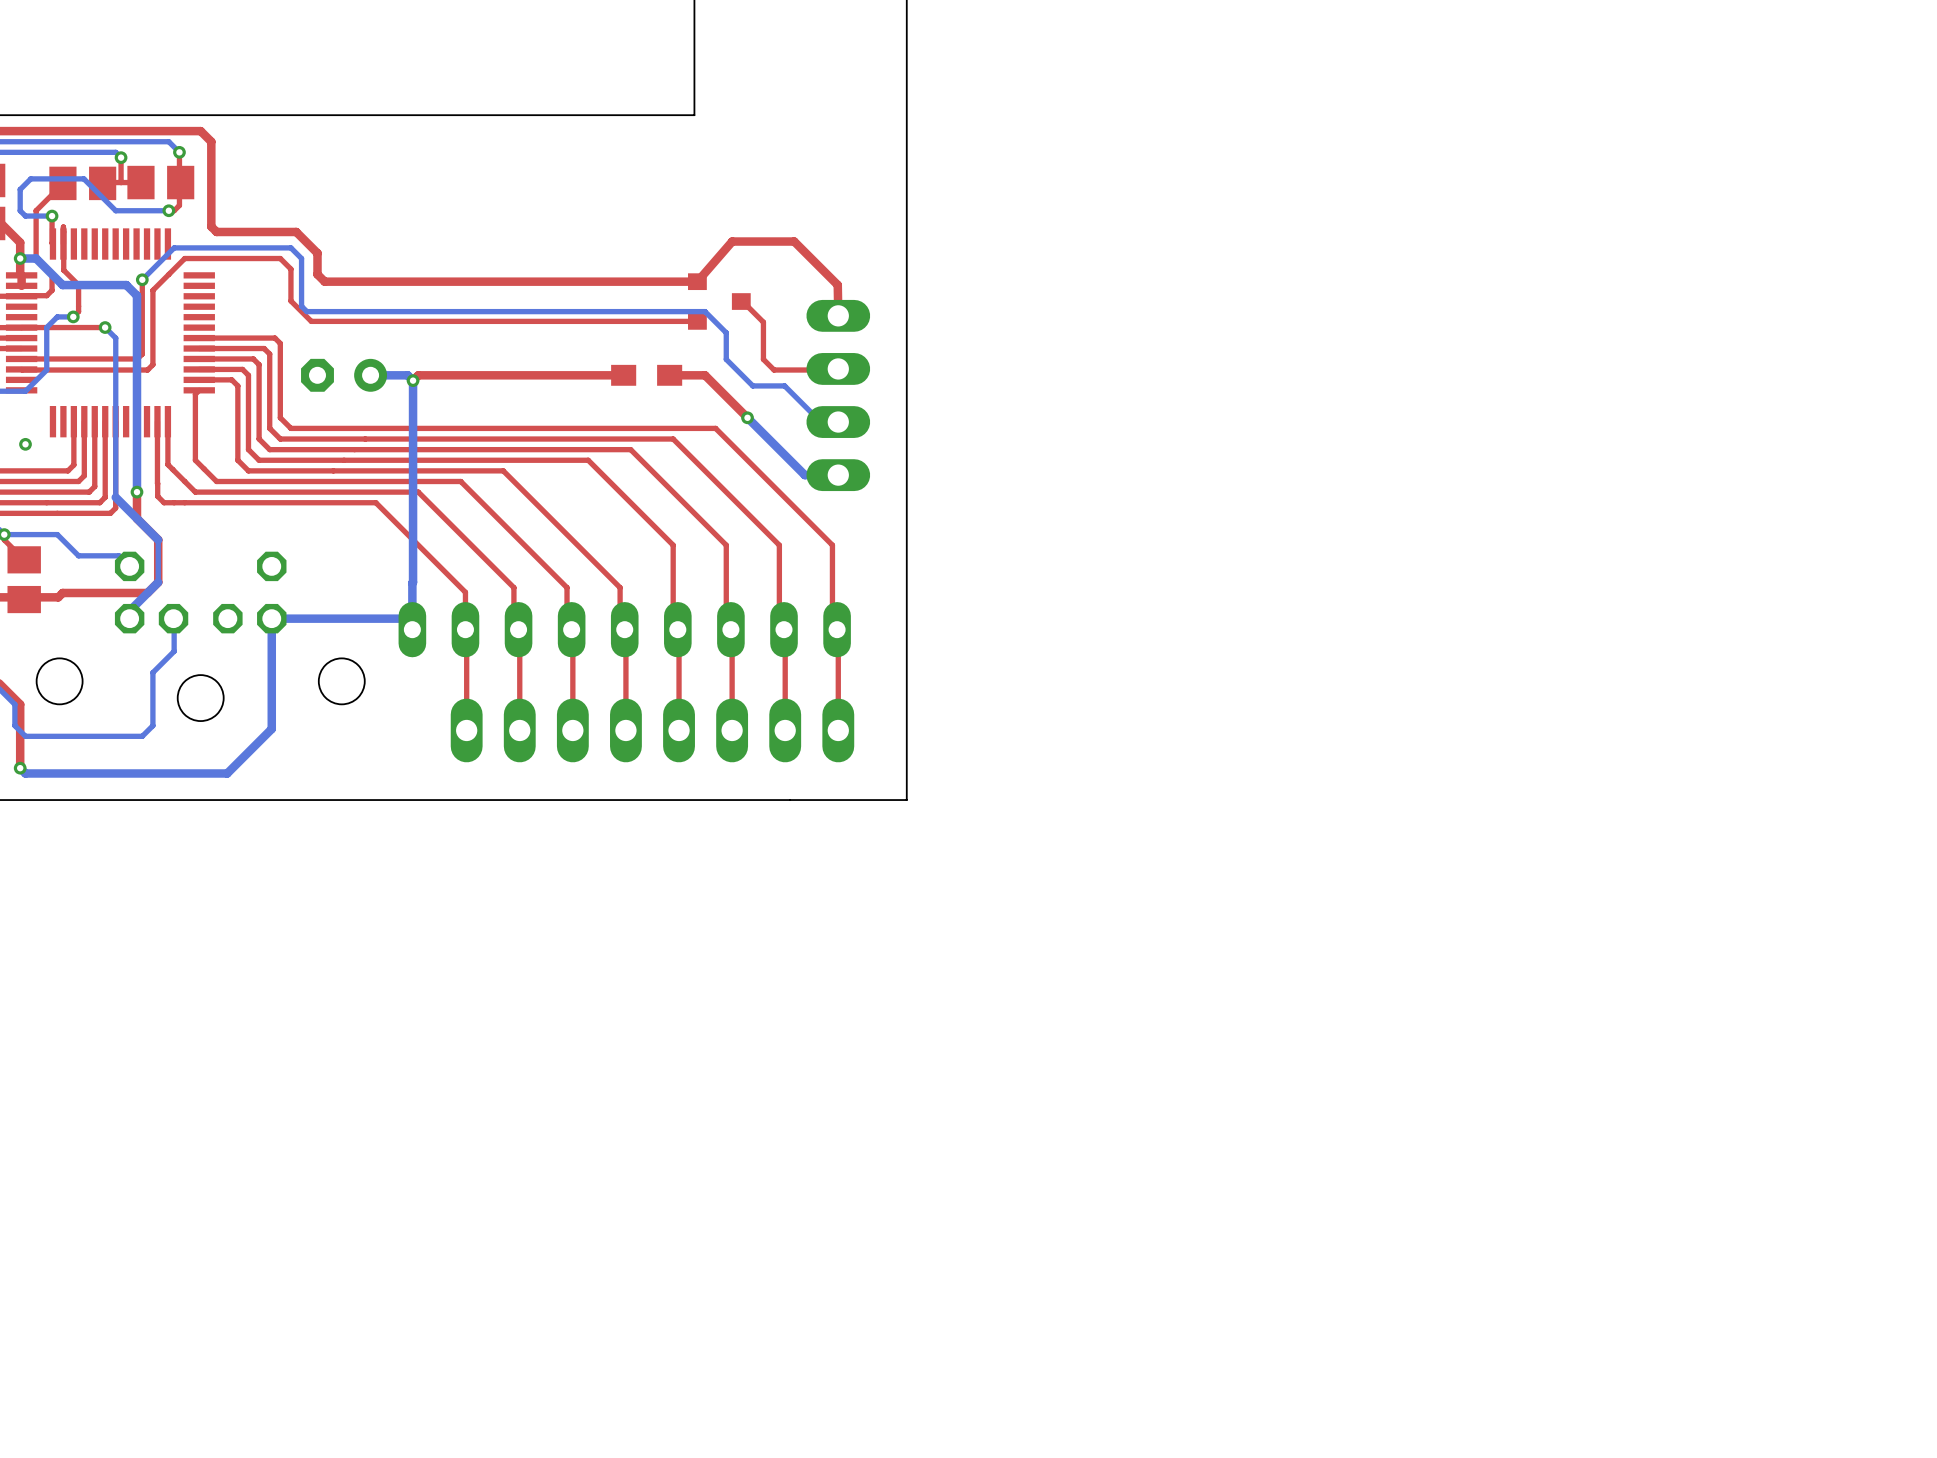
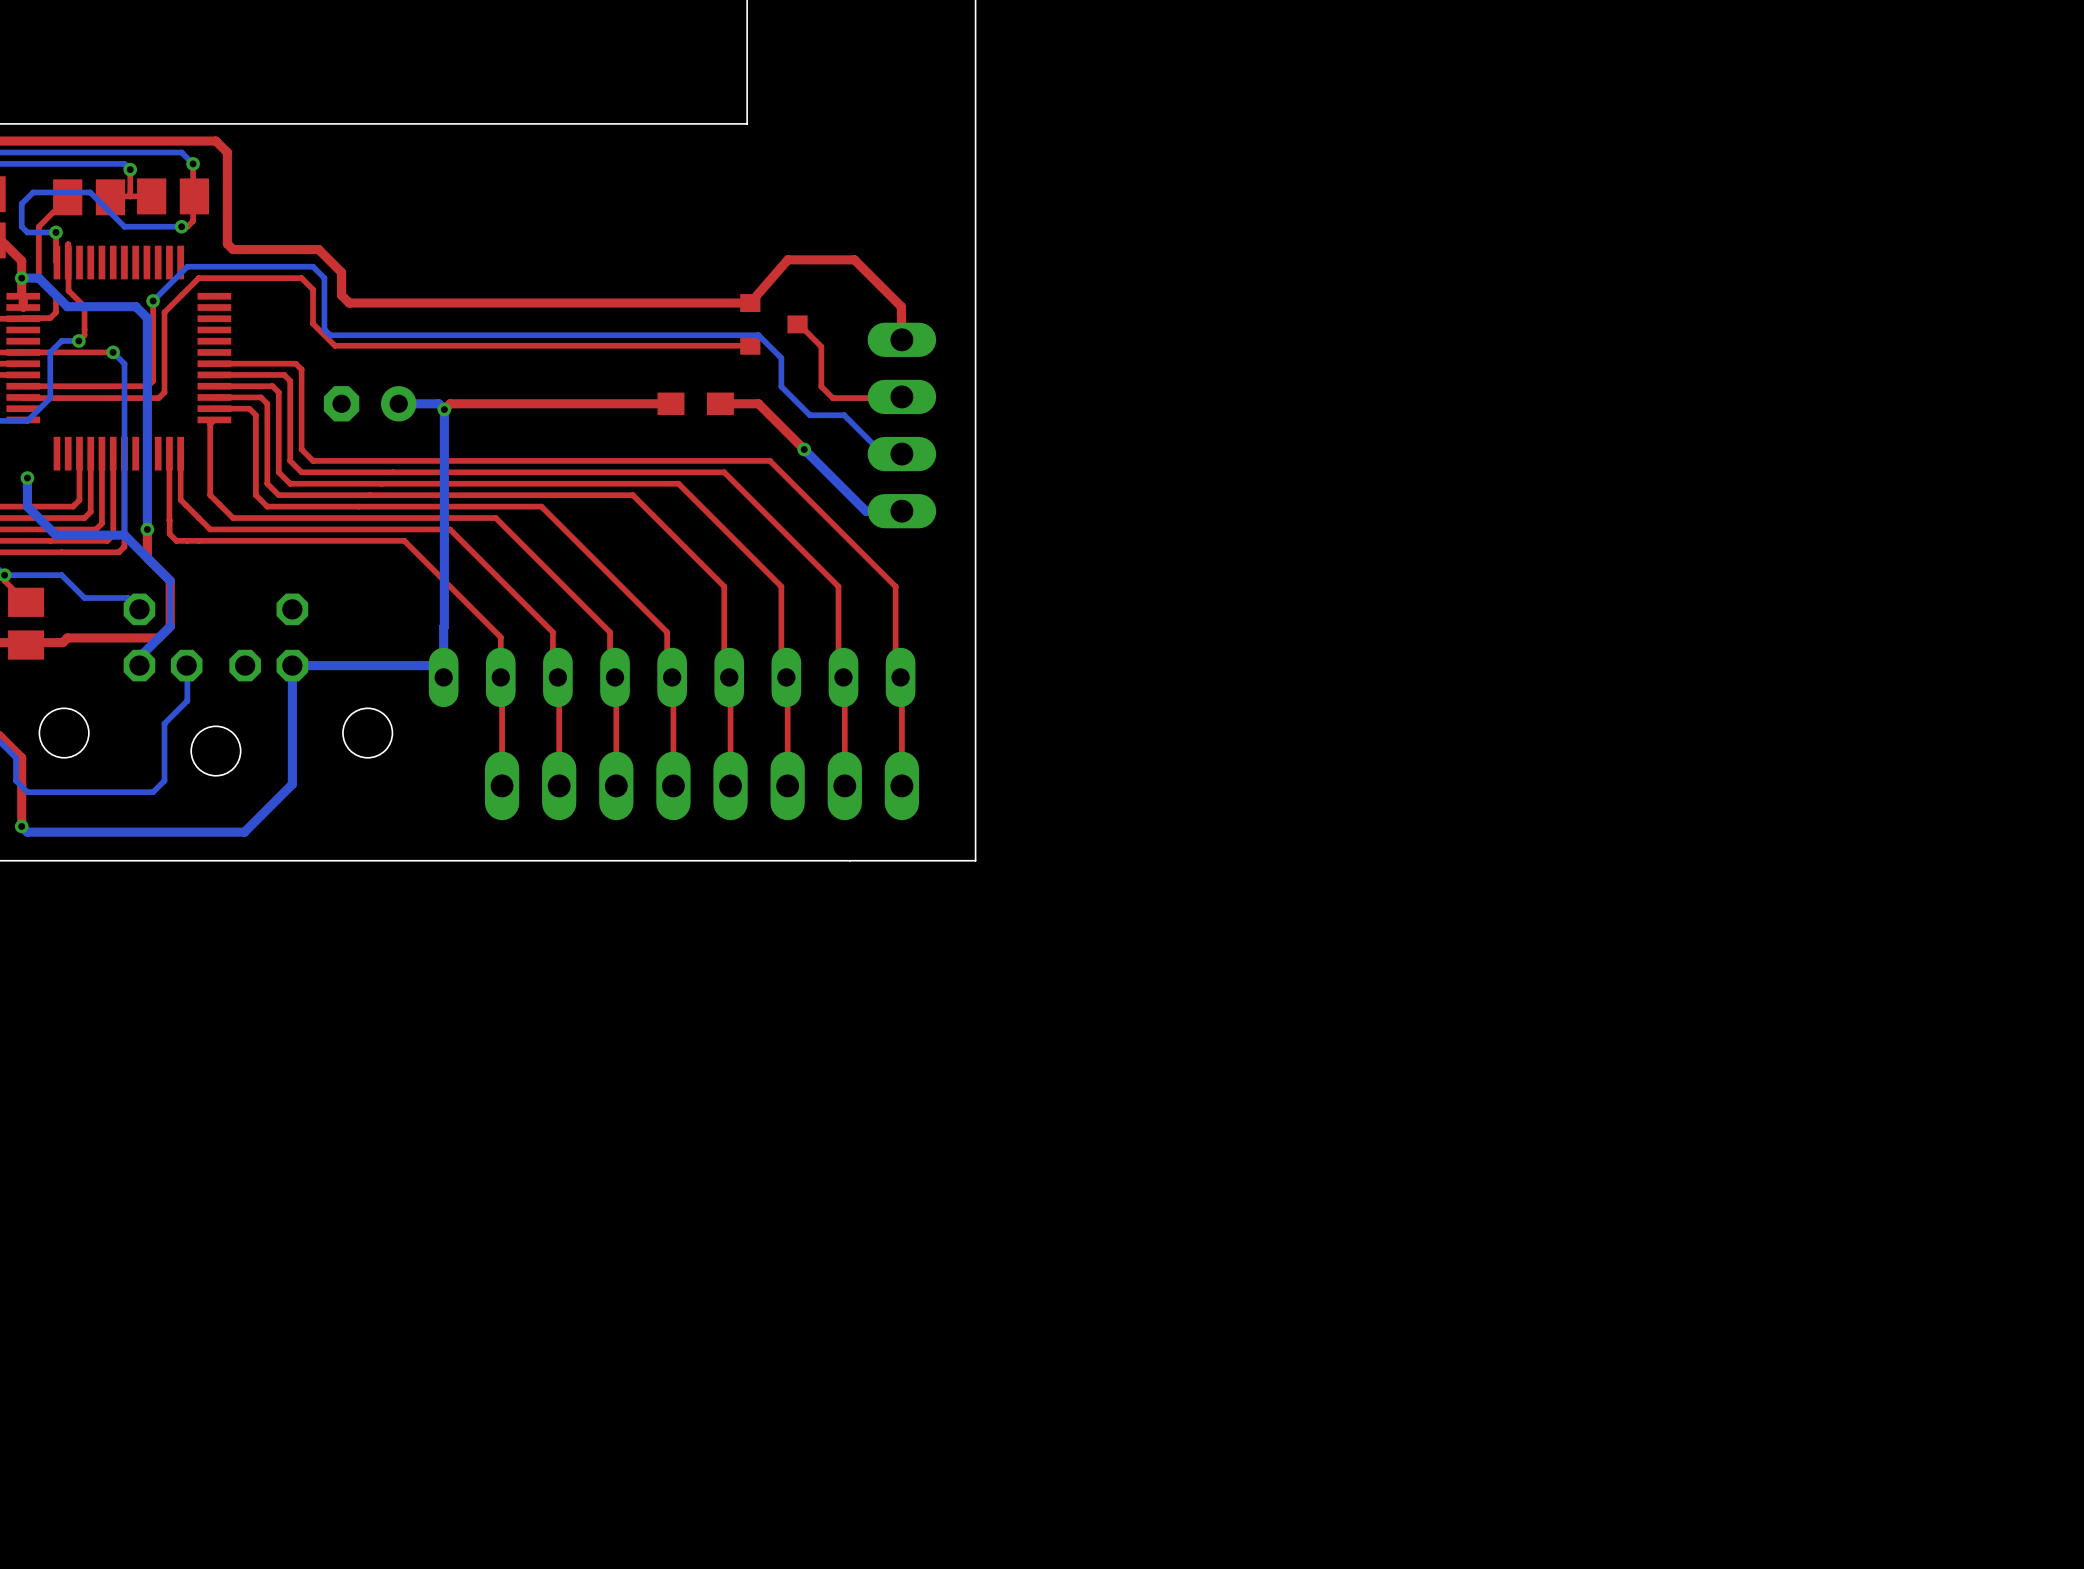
bottom track: none -> (27, 478) (27, 506) (55, 535) (124, 535)

